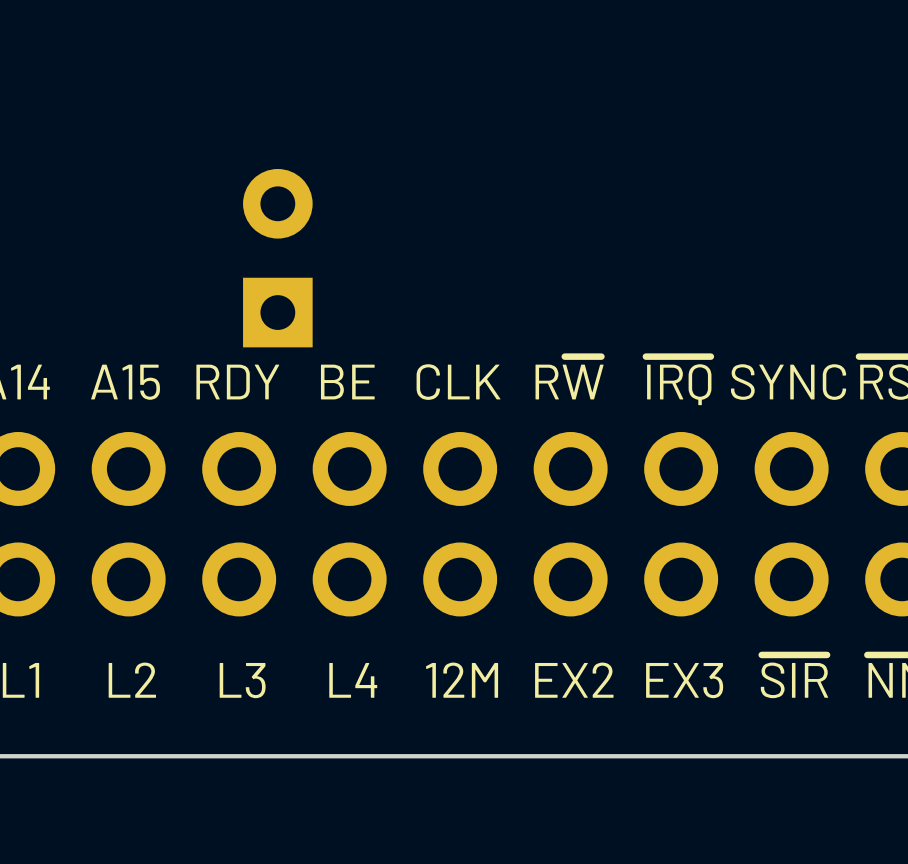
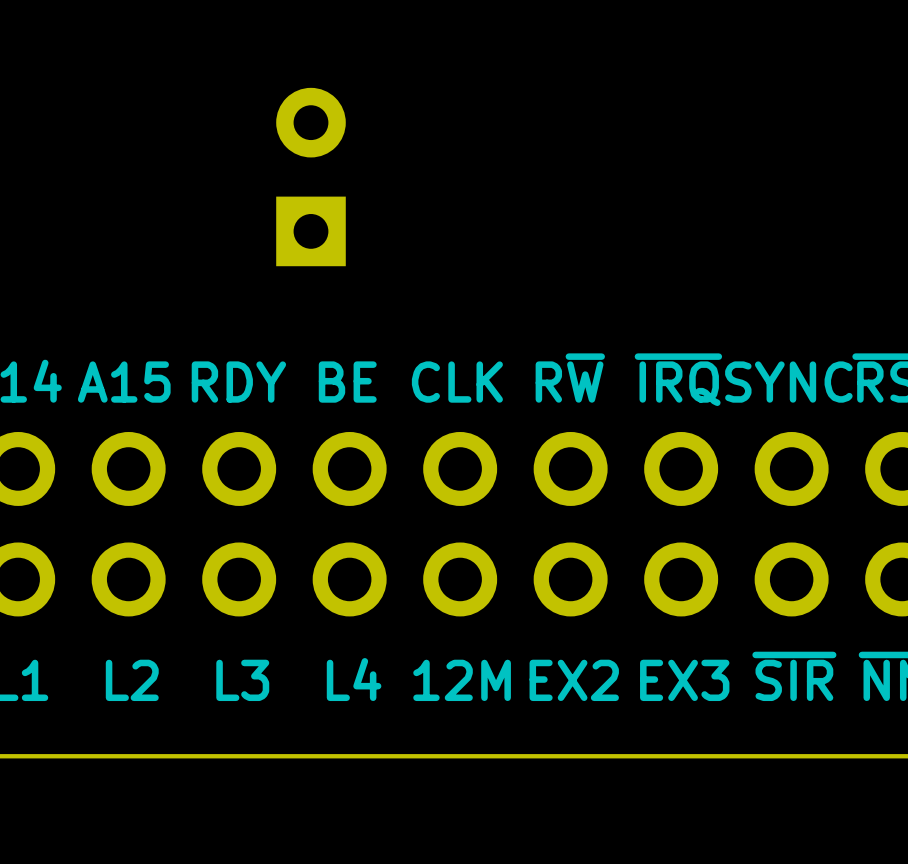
part position: (277, 258) -> (310, 177)

